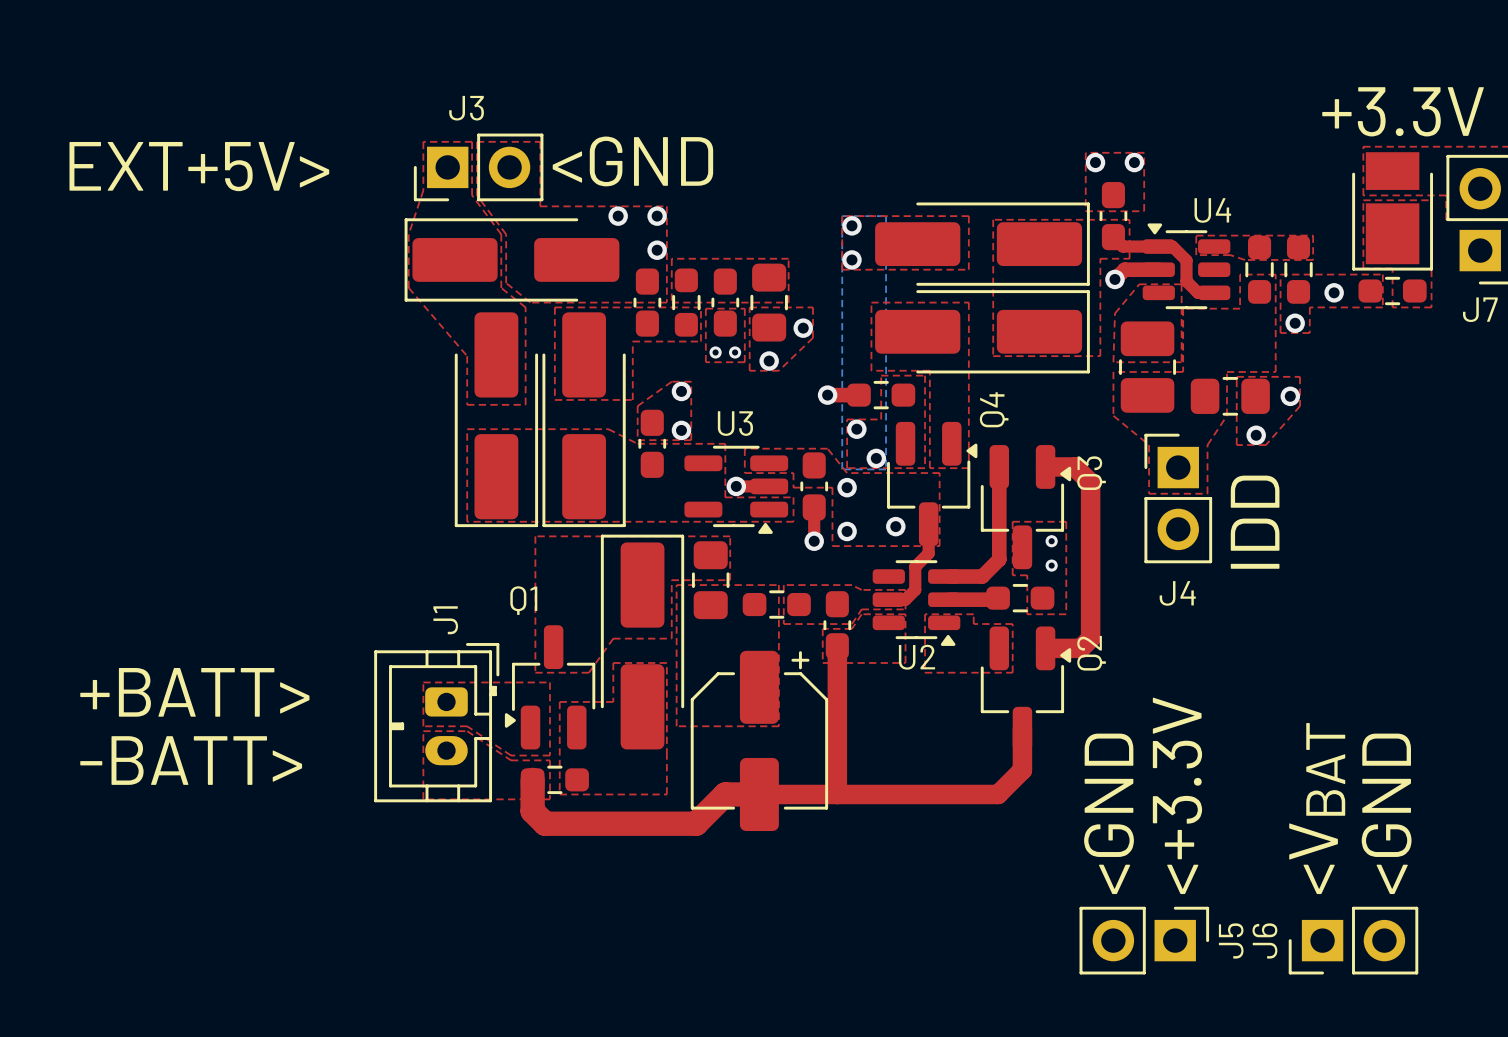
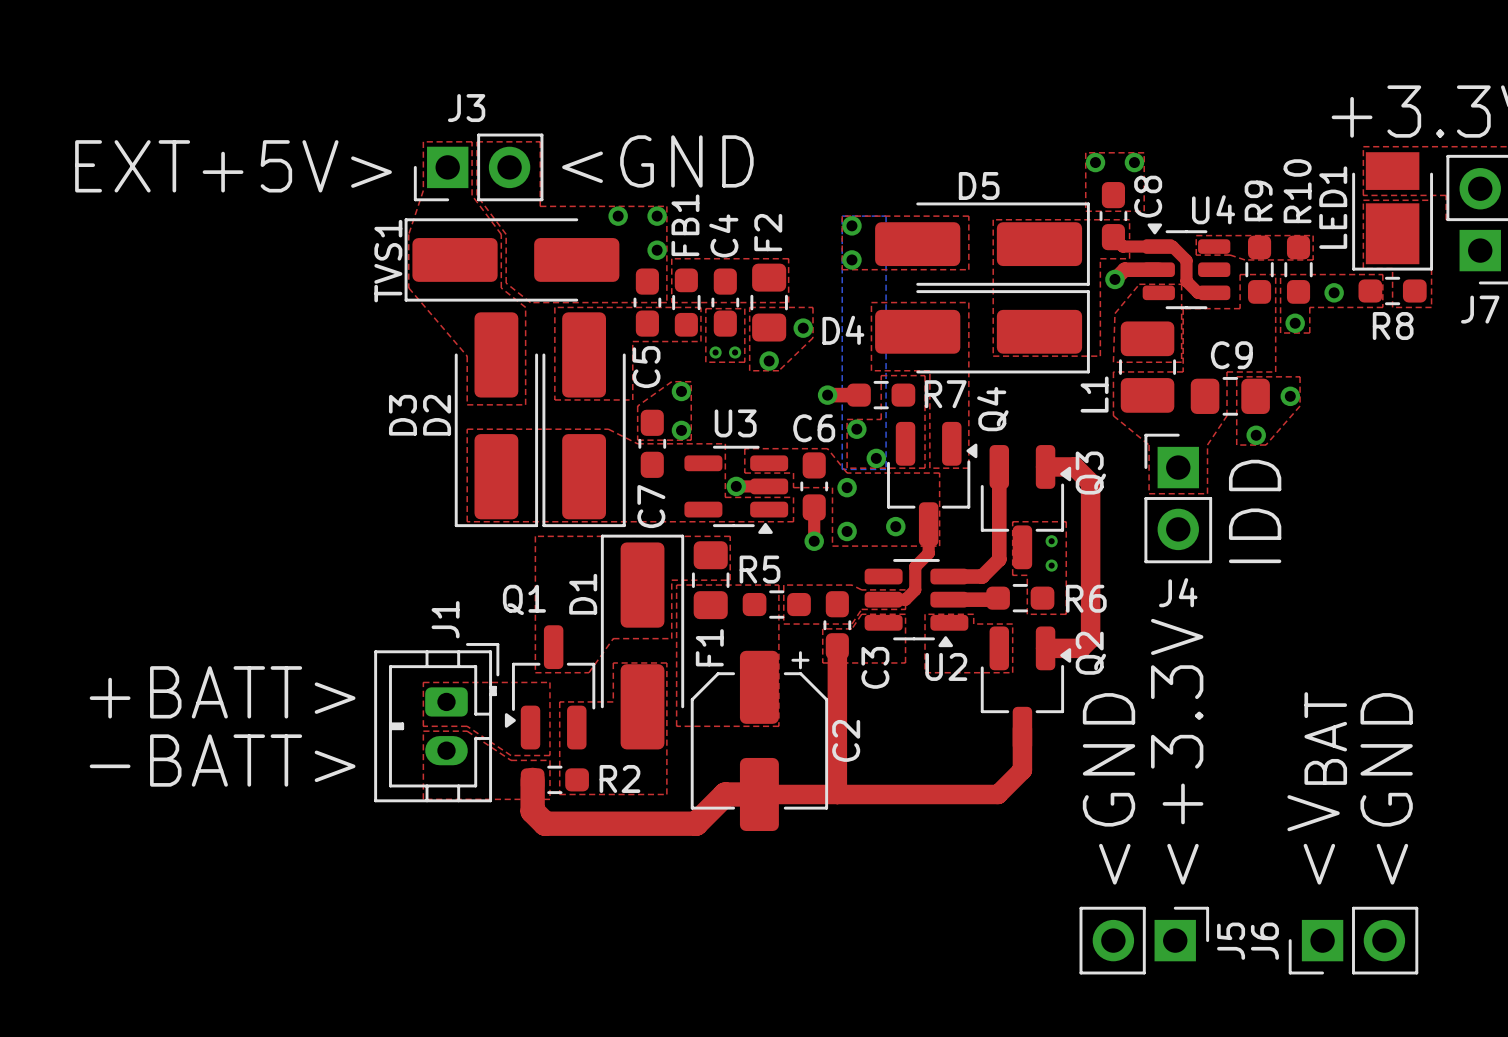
D5 name: none -> D5 (979, 185)
R10 name: none -> R10 (1297, 191)
C8 name: none -> C8 (1148, 196)
R9 name: none -> R9 (1258, 200)
LED1 name: none -> LED1 (1333, 207)
FB1 name: none -> FB1 (685, 225)
F2 name: none -> F2 (768, 232)
C4 name: none -> C4 (723, 235)
TVS1 name: none -> TVS1 (388, 261)
R8 name: none -> R8 (1393, 326)
D4 name: none -> D4 (843, 330)
C9 name: none -> C9 (1231, 355)
C5 name: none -> C5 (646, 367)
R7 name: none -> R7 (945, 394)
L1 name: none -> L1 (1094, 394)
D3 name: none -> D3 (402, 415)
D2 name: none -> D2 (437, 415)
C6 name: none -> C6 (814, 428)
C7 name: none -> C7 (651, 506)
U2 footprint: [872, 560, 961, 646] -> [864, 559, 969, 648]
R5 name: none -> R5 (760, 569)
D1 name: none -> D1 (583, 594)
R6 name: none -> R6 (1086, 598)
F1 name: none -> F1 (709, 647)
U2 name position: U2 (916, 657) -> U2 (946, 666)
C3 name: none -> C3 (875, 667)
C2 name: none -> C2 (846, 740)
R2 name: none -> R2 (619, 778)

